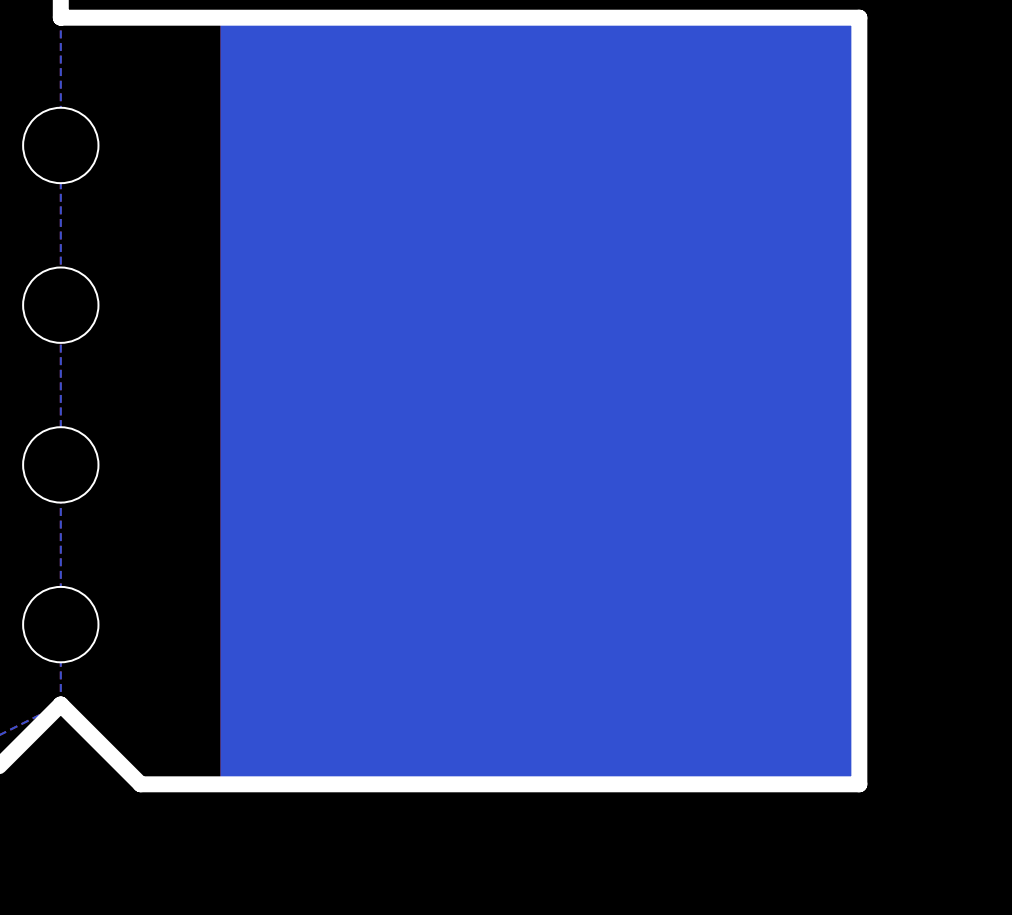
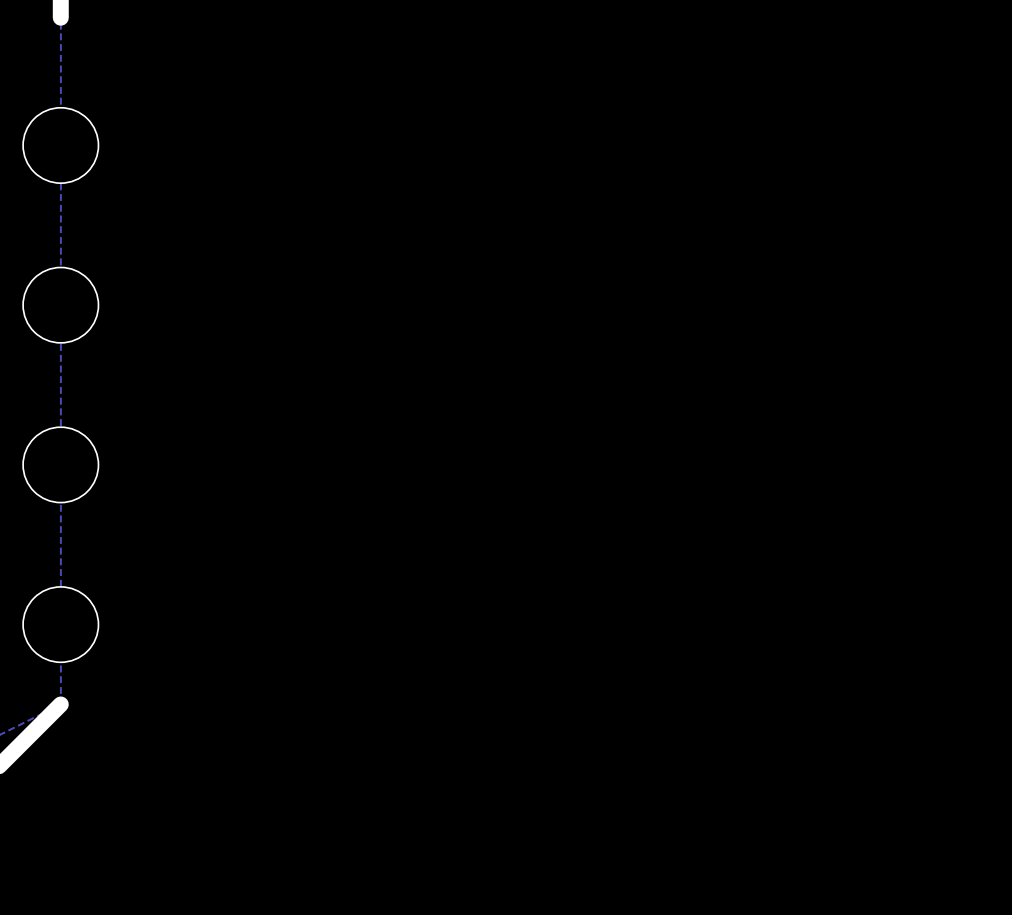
board edge: (60, 17) (859, 17) (859, 784) (140, 784) (60, 704) -> none
drawing: [220, 17, 860, 785] -> none

